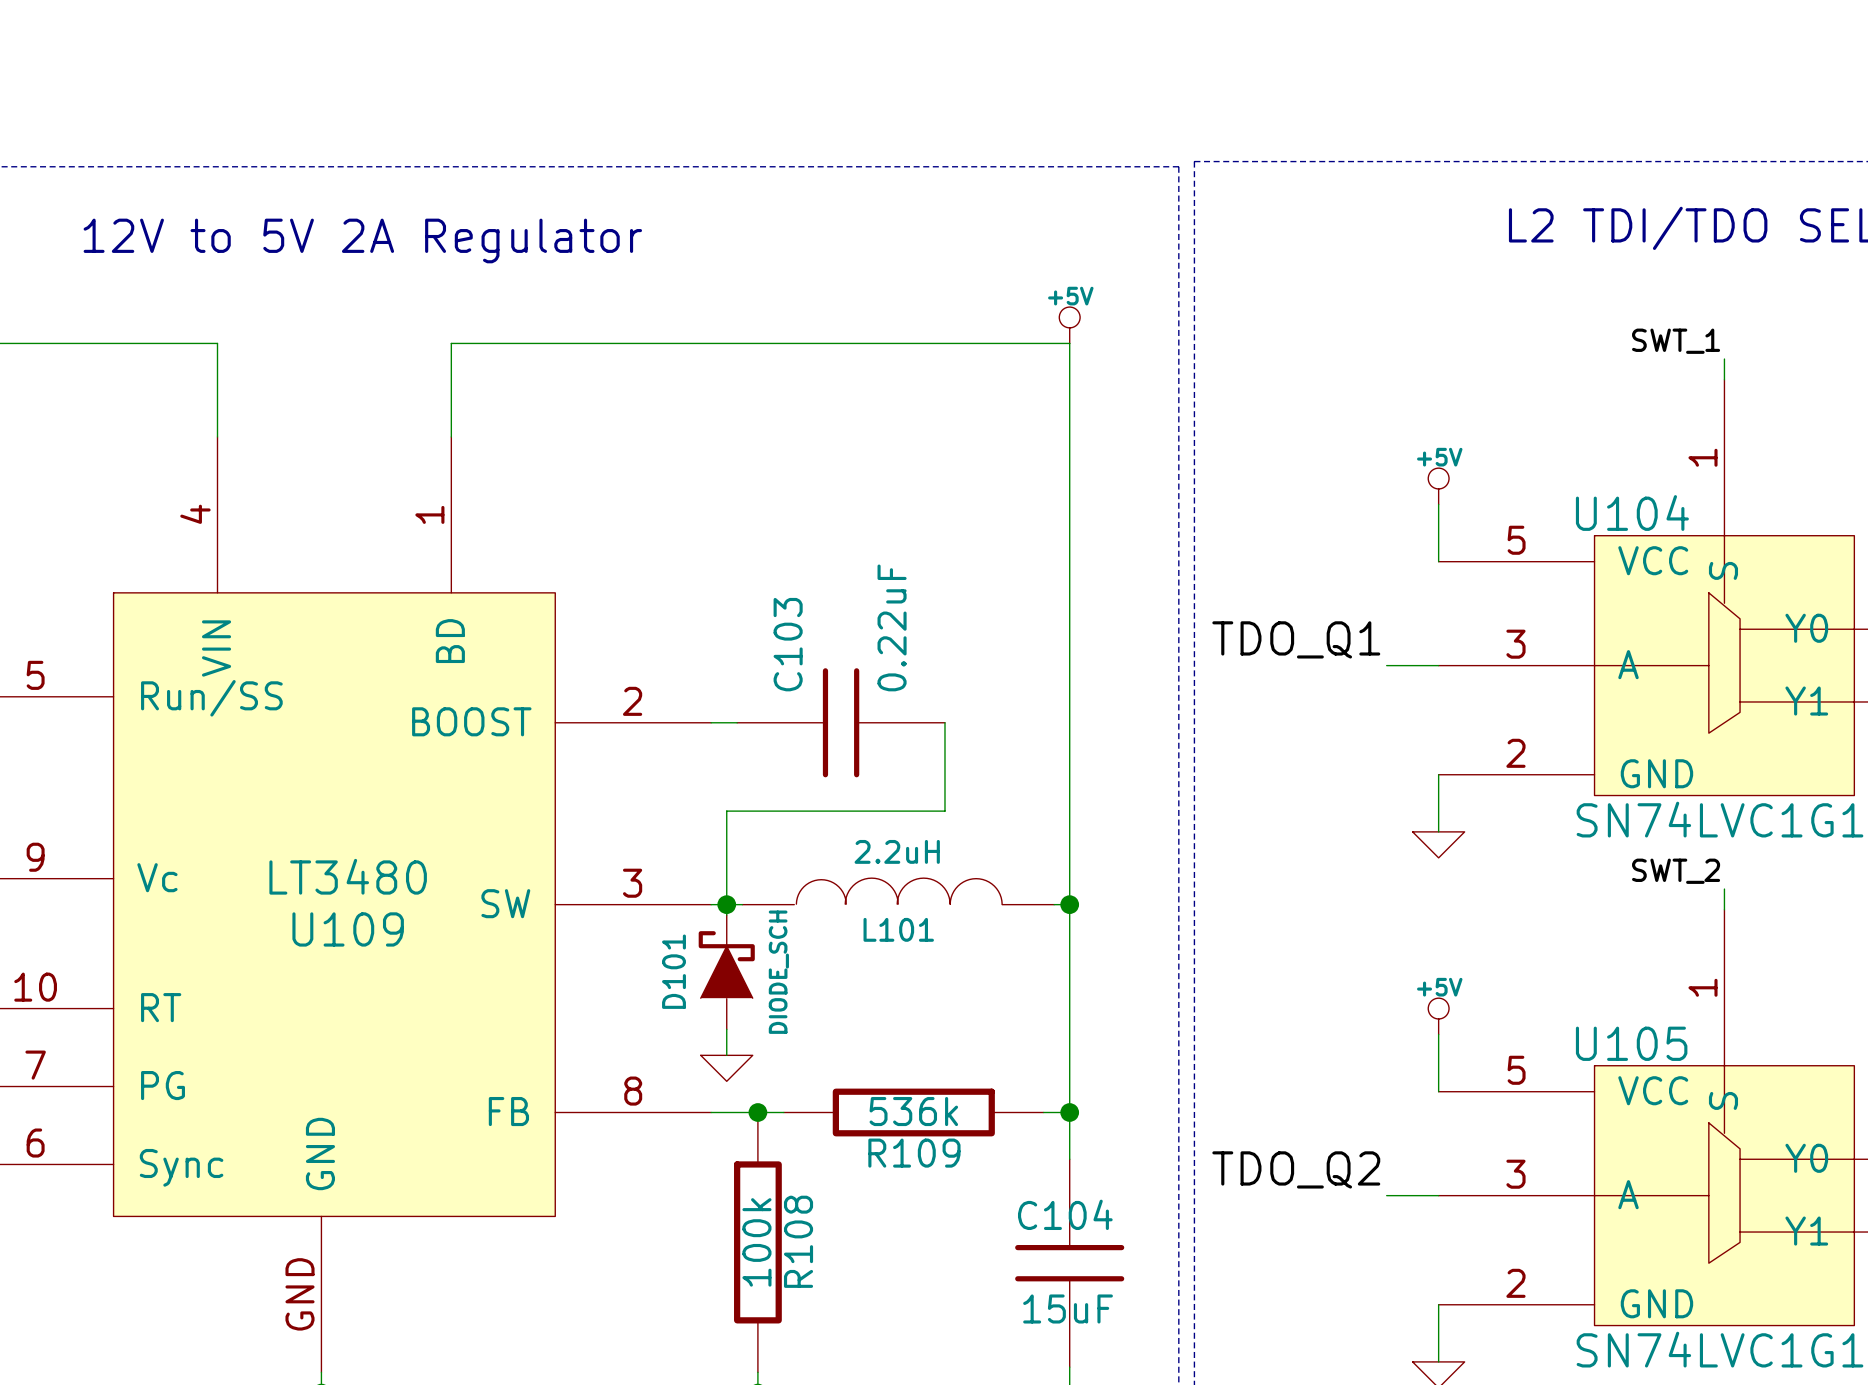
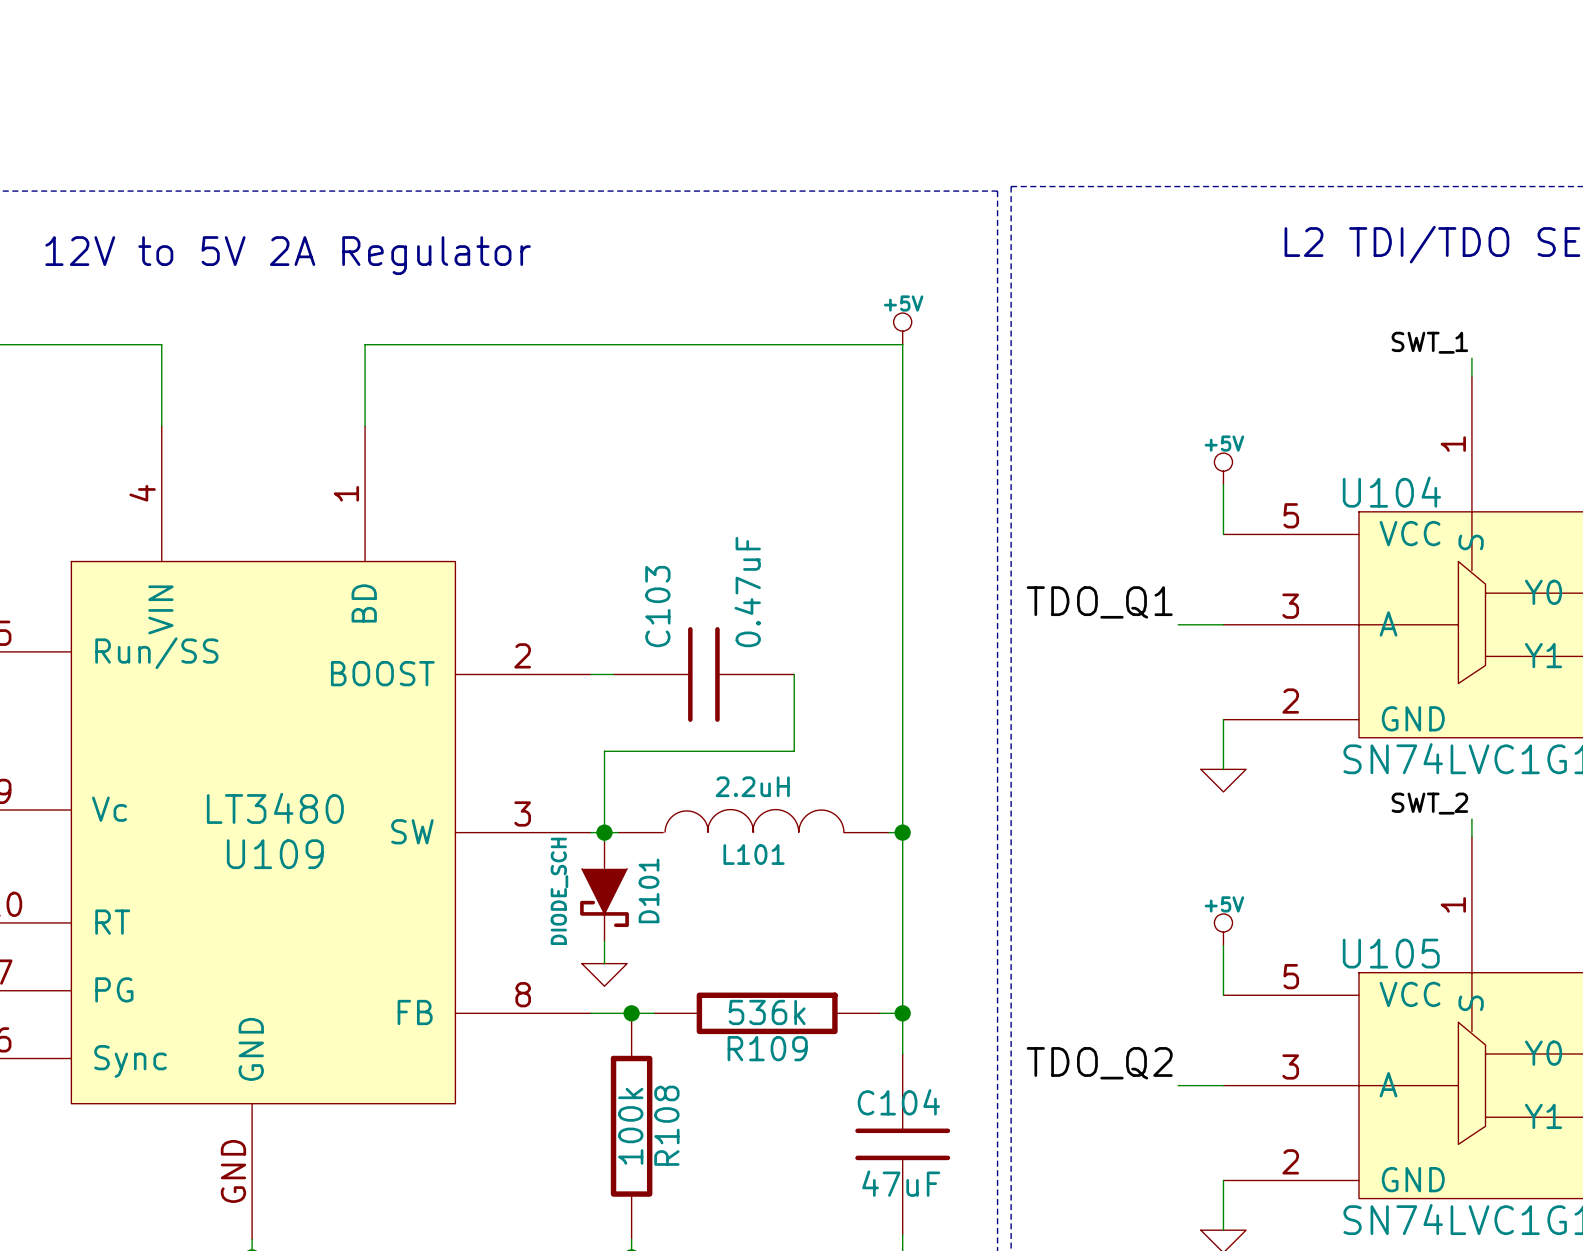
C103 value: 0.22uF (892, 627) -> 0.47uF (747, 592)
D101 rotation: 0° (726, 964) -> 180° (604, 897)
C104 value: 15uF (1068, 1308) -> 47uF (901, 1183)

